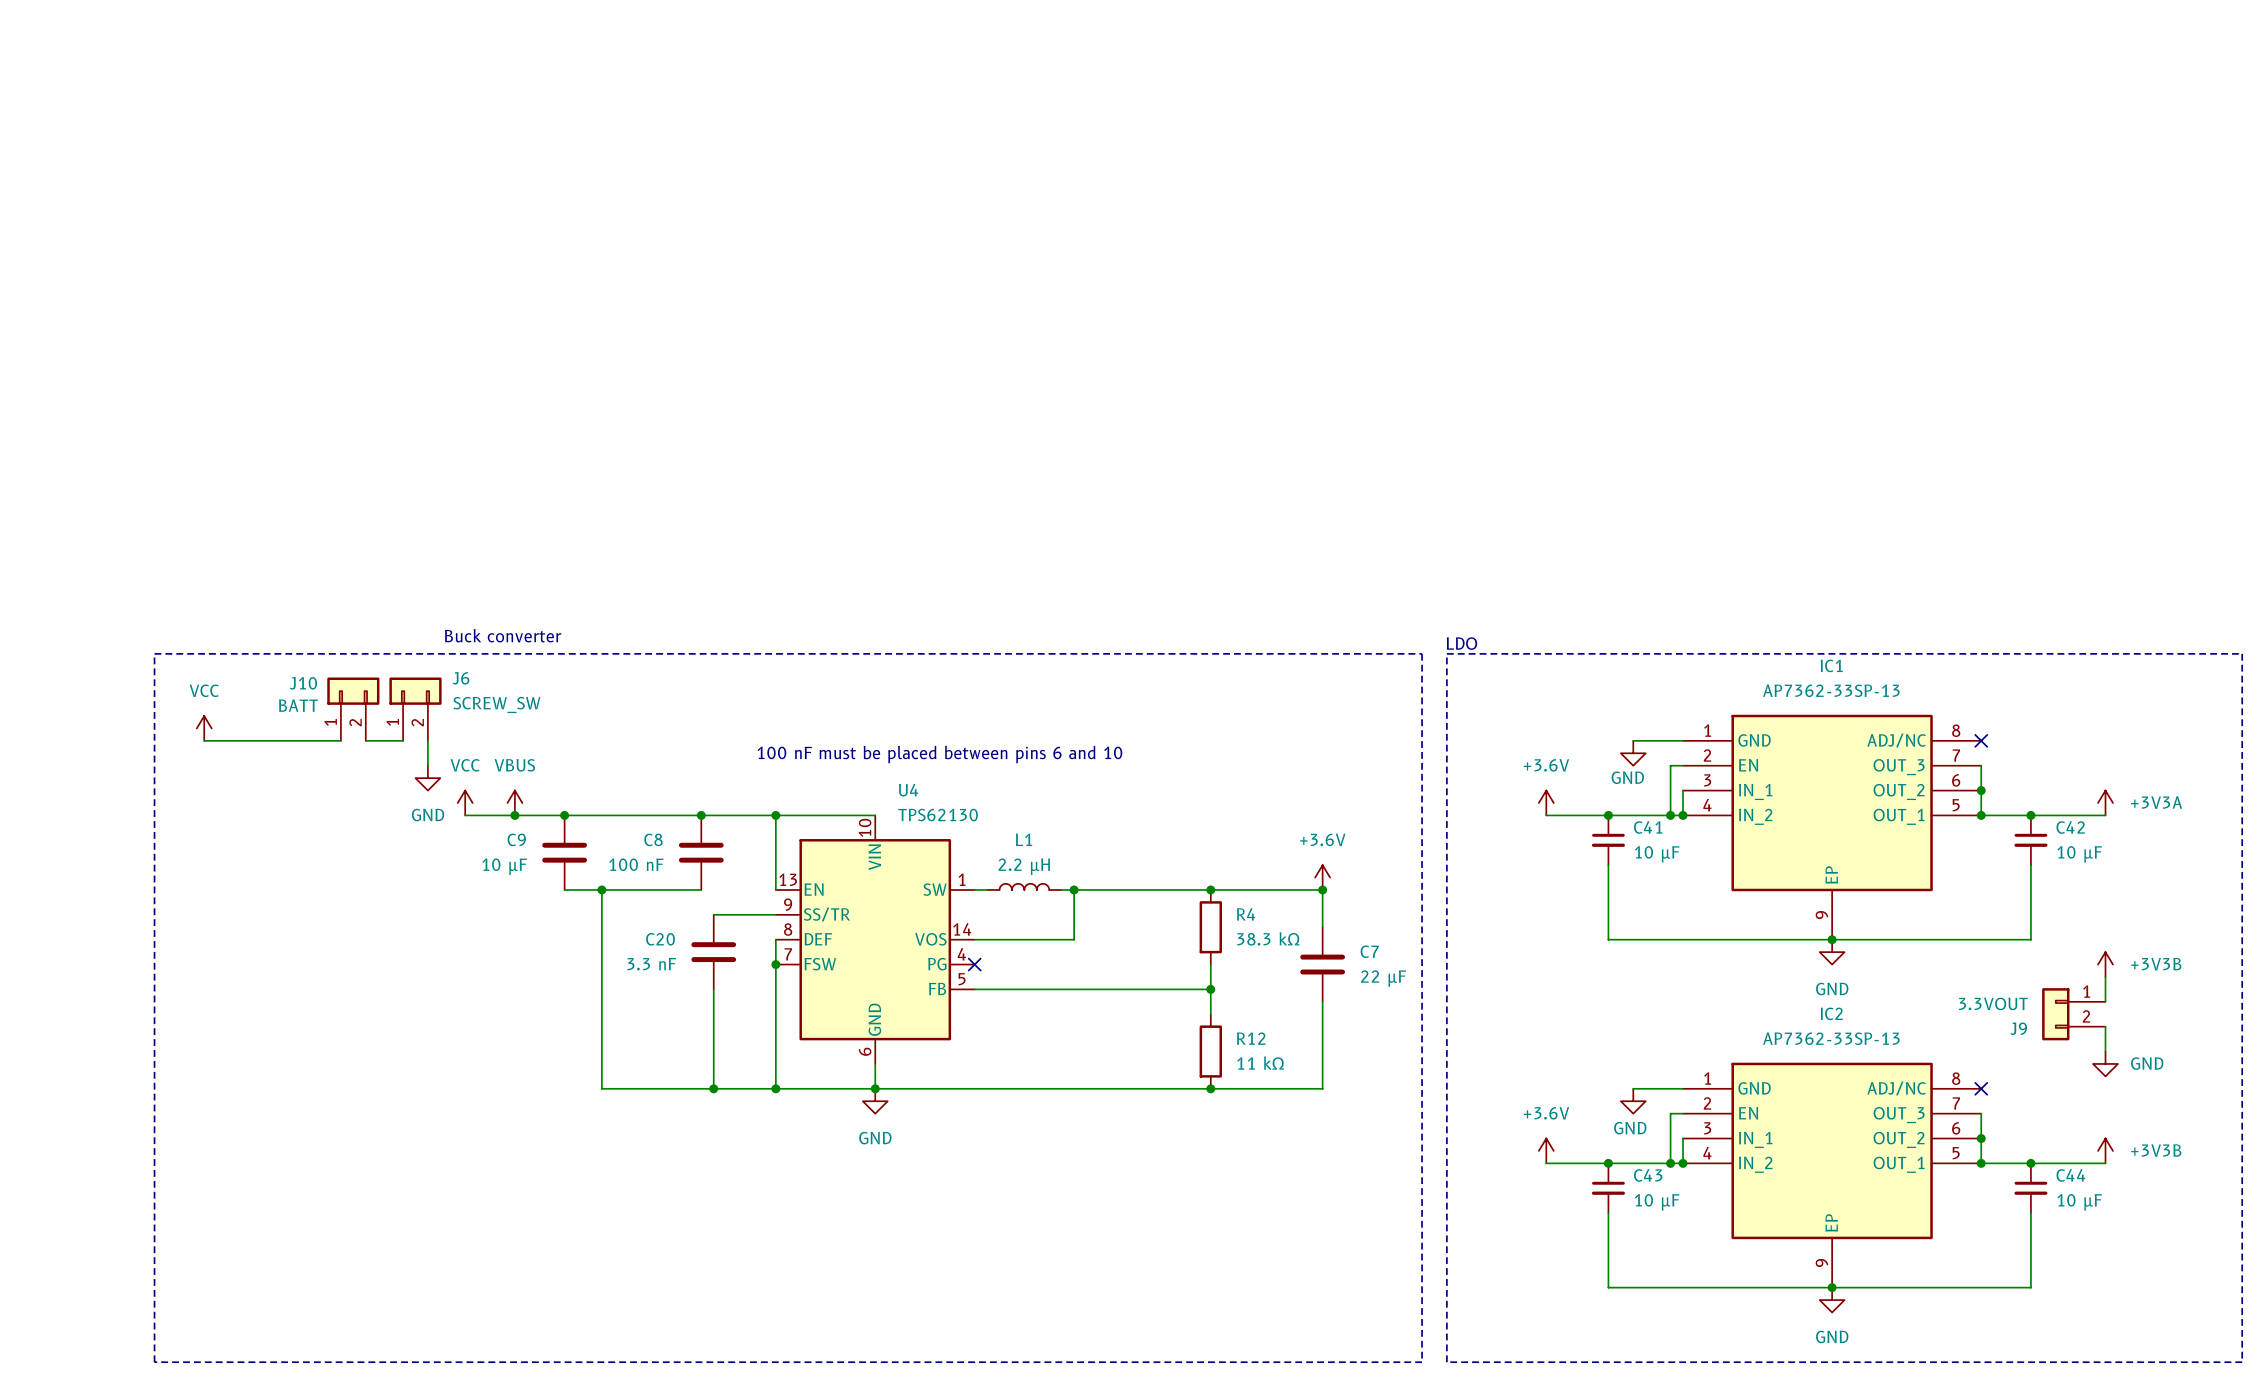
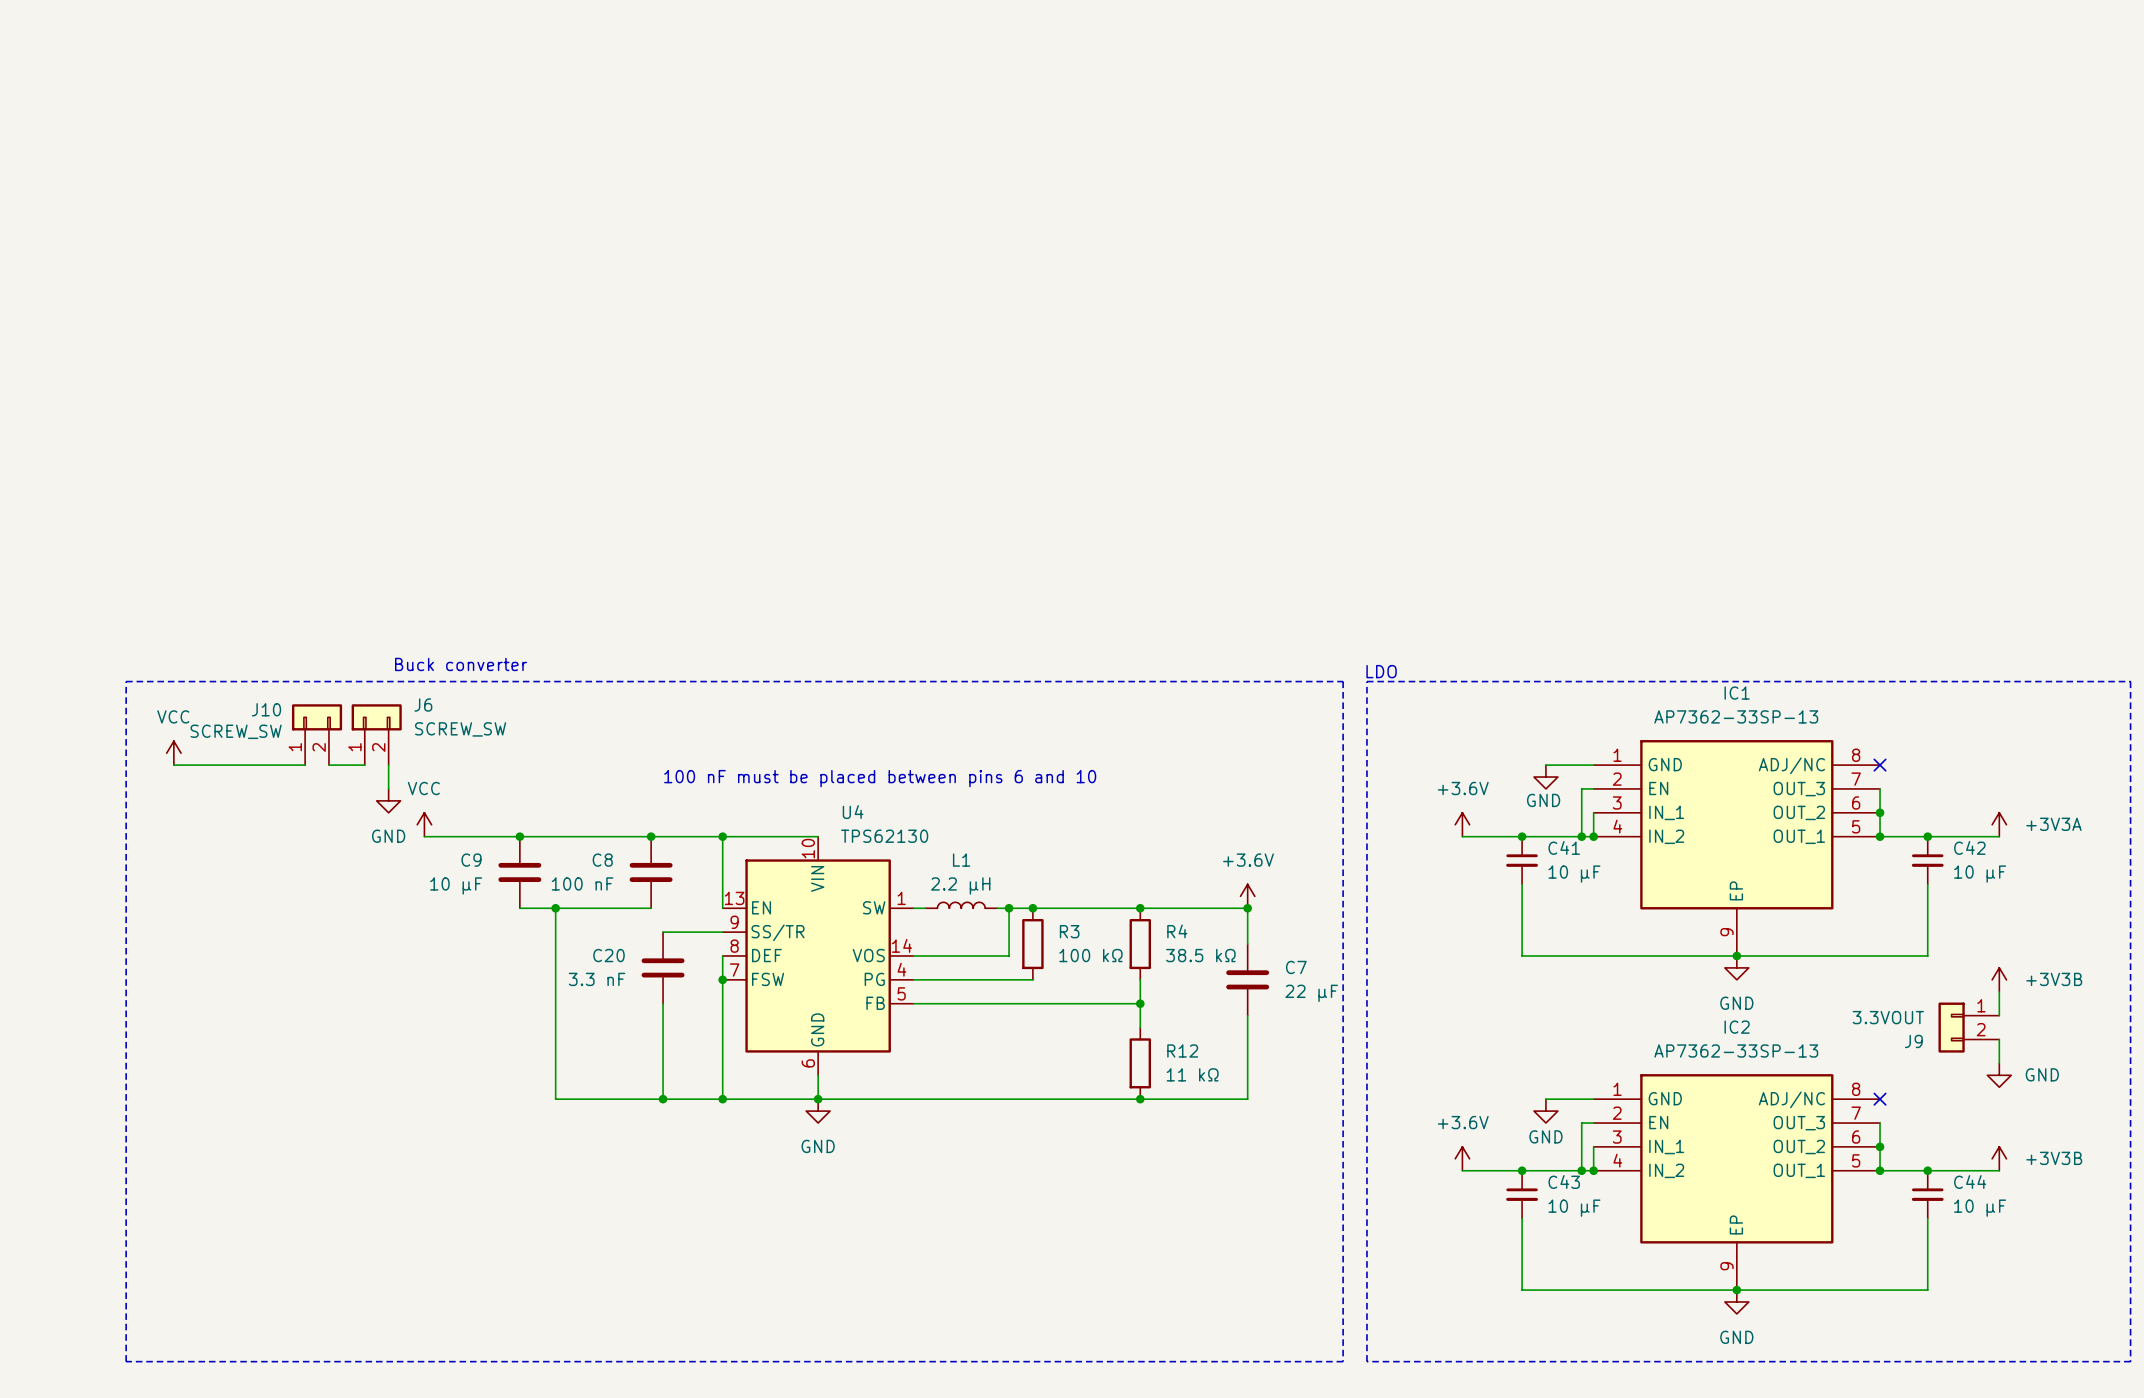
J10 value: BATT (298, 705) -> SCREW_SW (236, 731)
power symbol: VBUS (514, 803) -> none
junction: (514, 815) -> none
junction: none -> (1032, 908)
R3: none -> 100 kΩ (1032, 944)
R4 value: 38.3 kΩ (1268, 938) -> 38.5 kΩ (1200, 955)
wire: none -> (913, 979) (1032, 979)
no-connect mark: (974, 964) -> none

